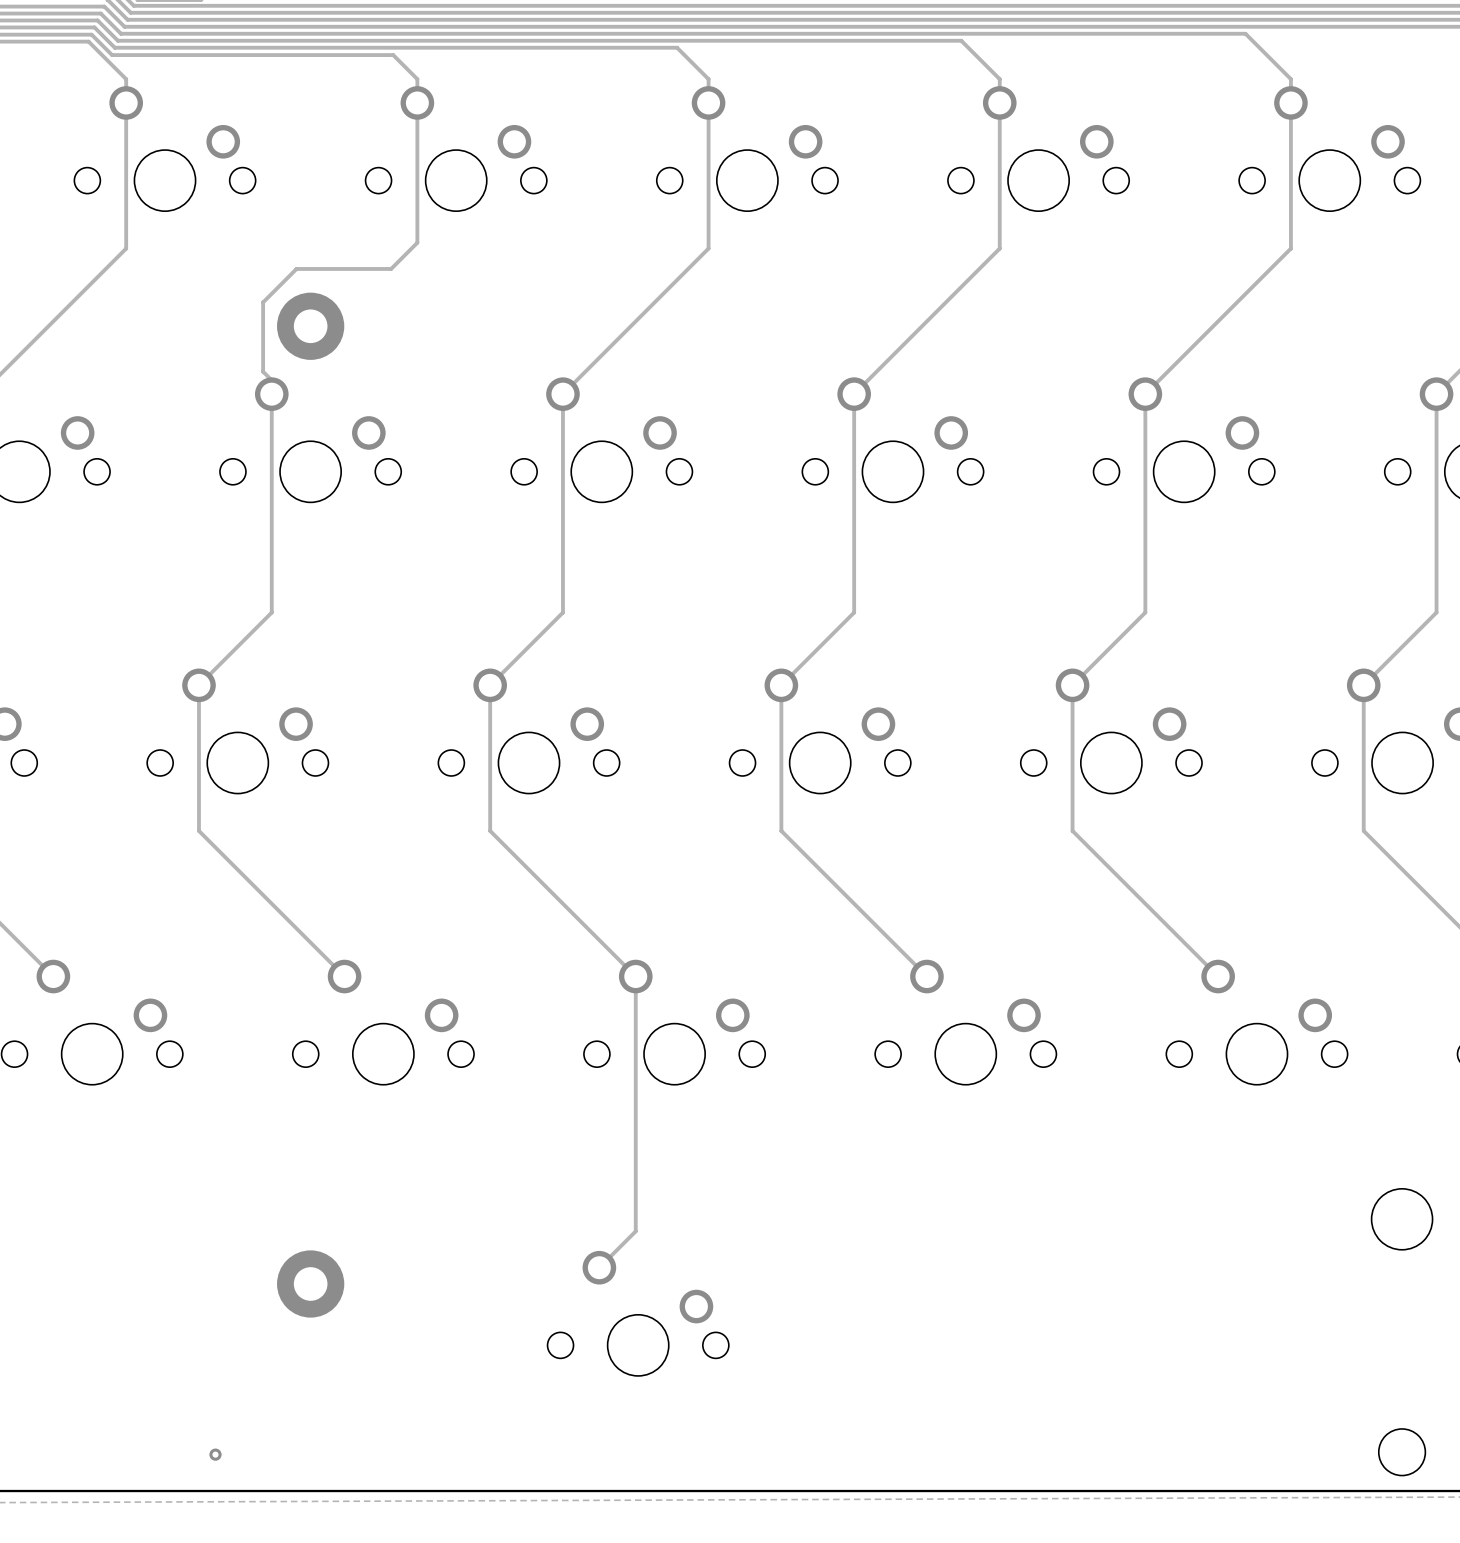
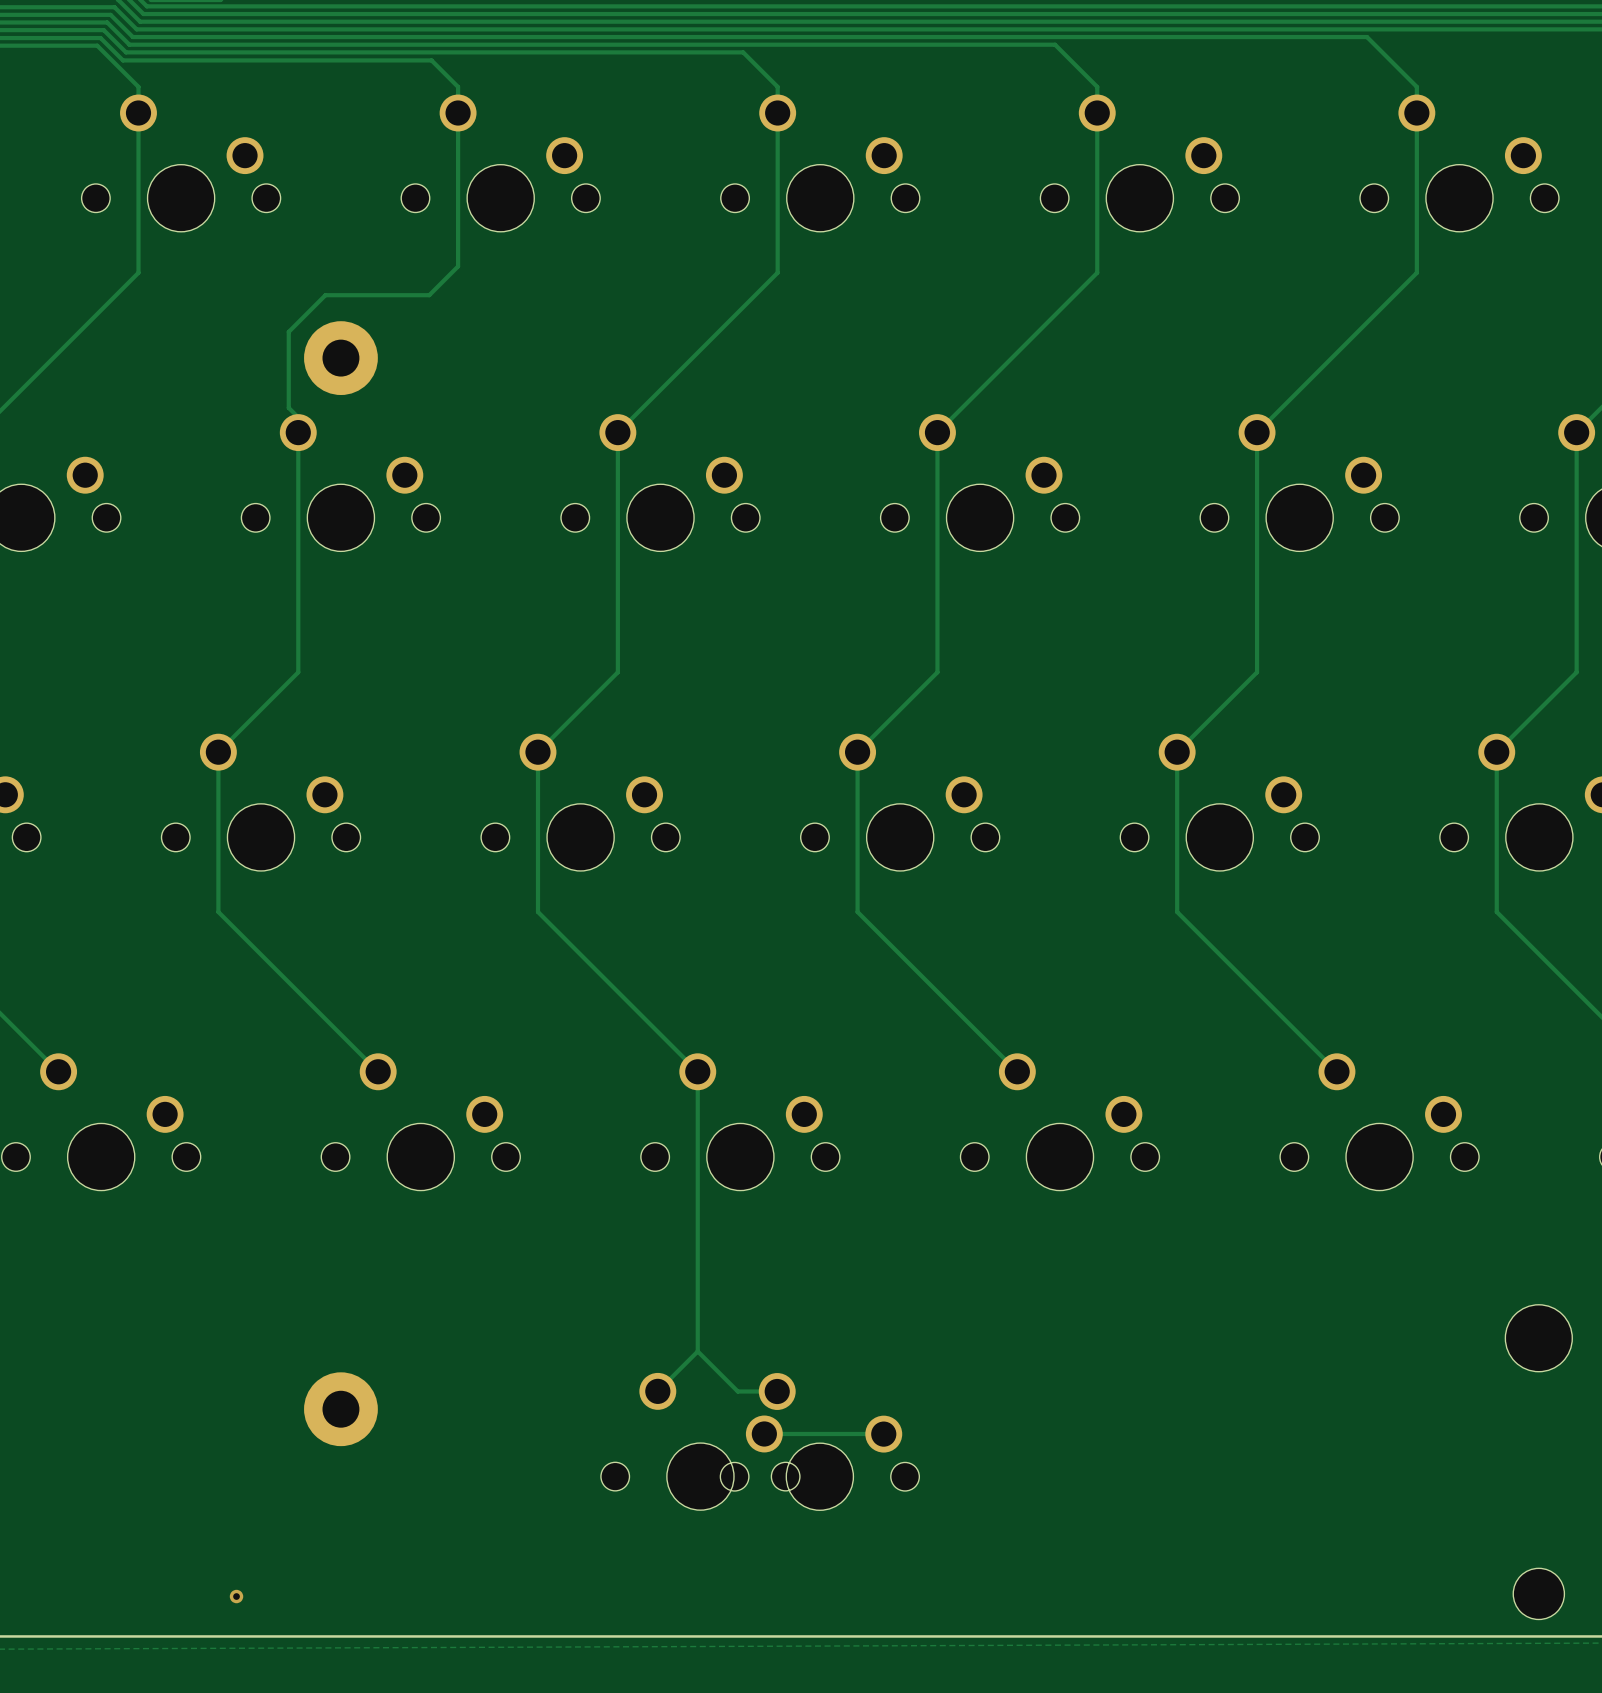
track: none -> (697, 1351) (737, 1391) (777, 1391)
track: none -> (883, 1433) (764, 1433)
part: none -> (819, 1441)

